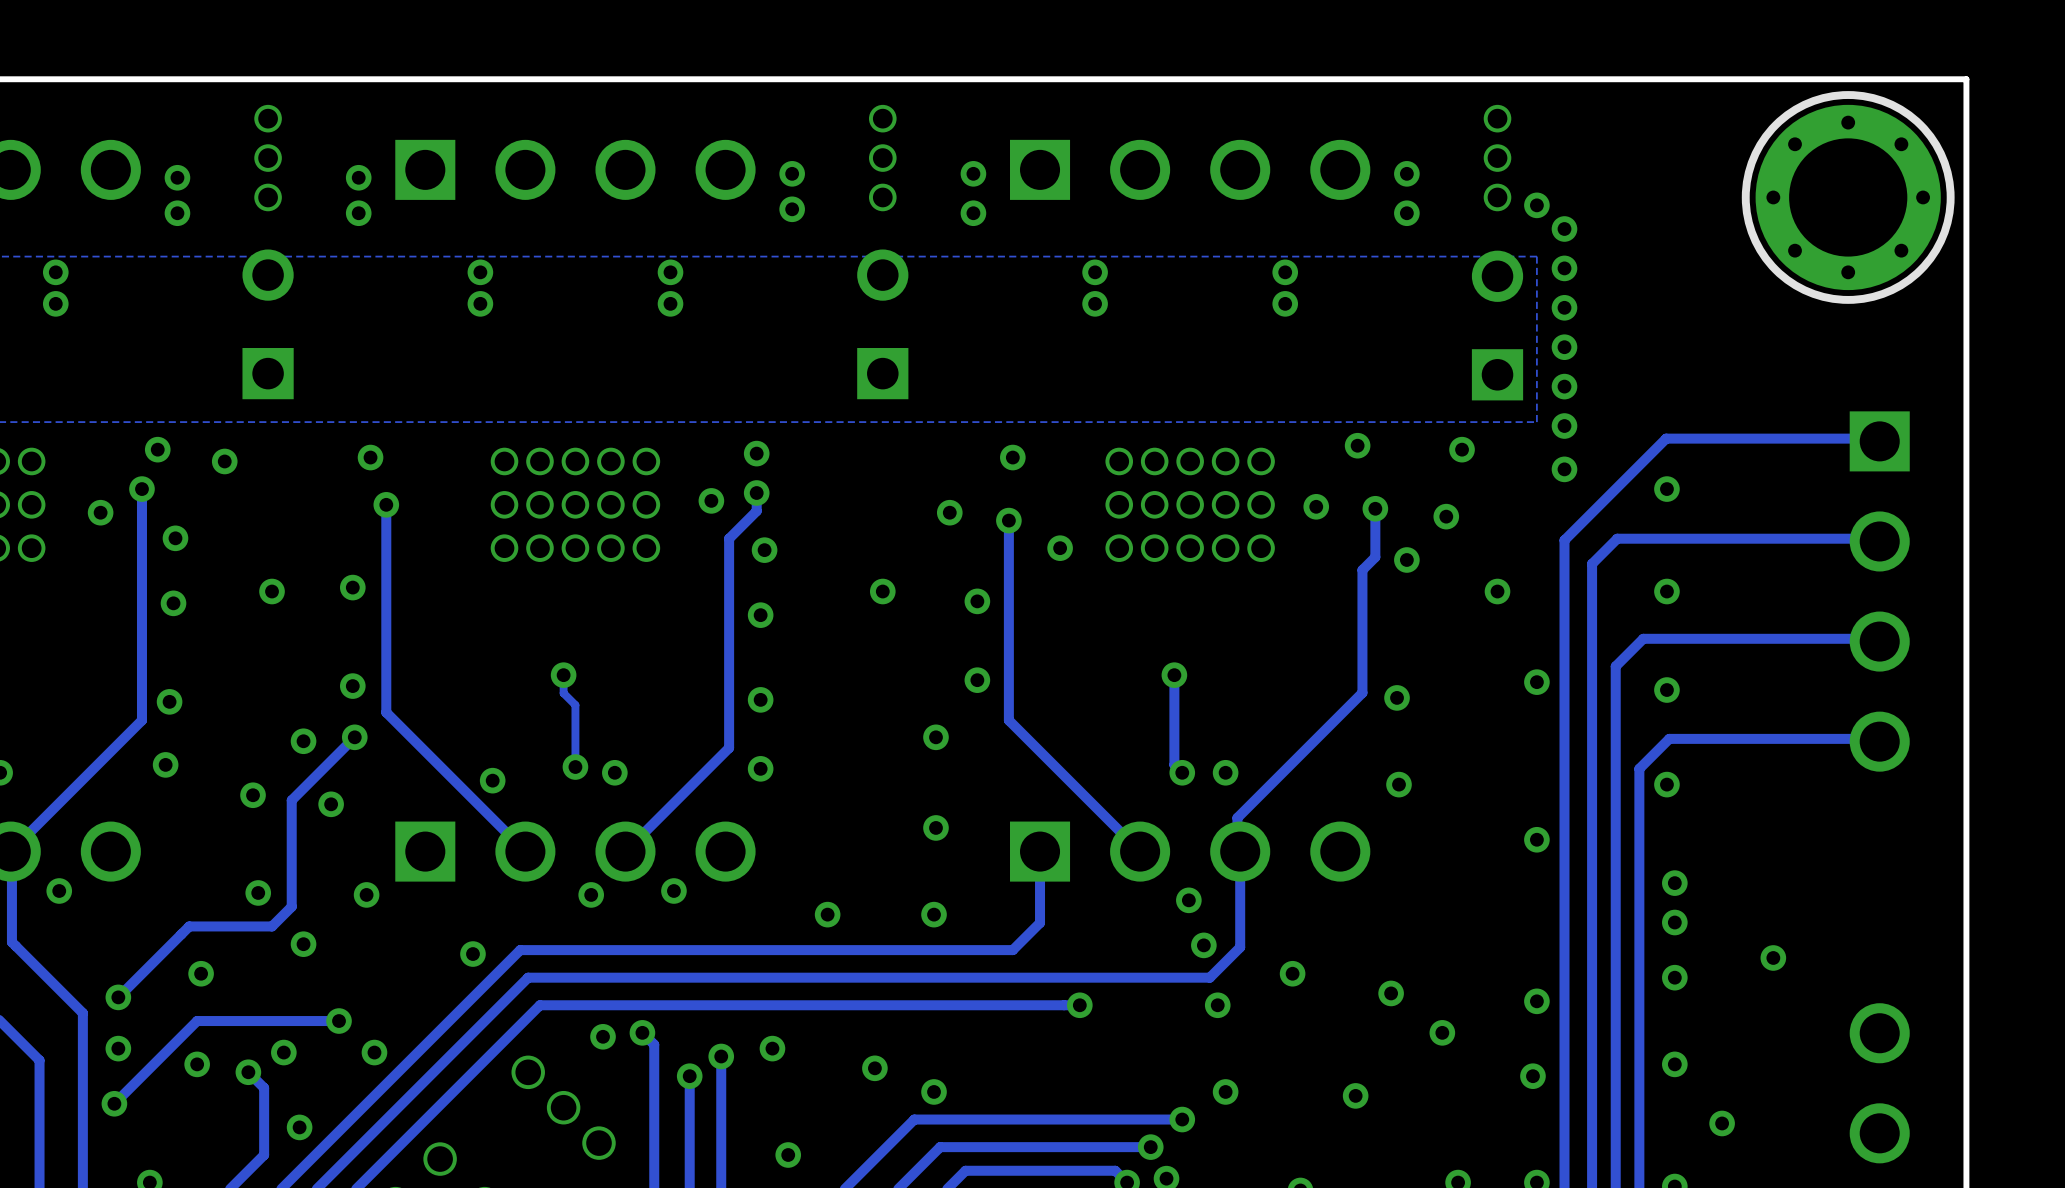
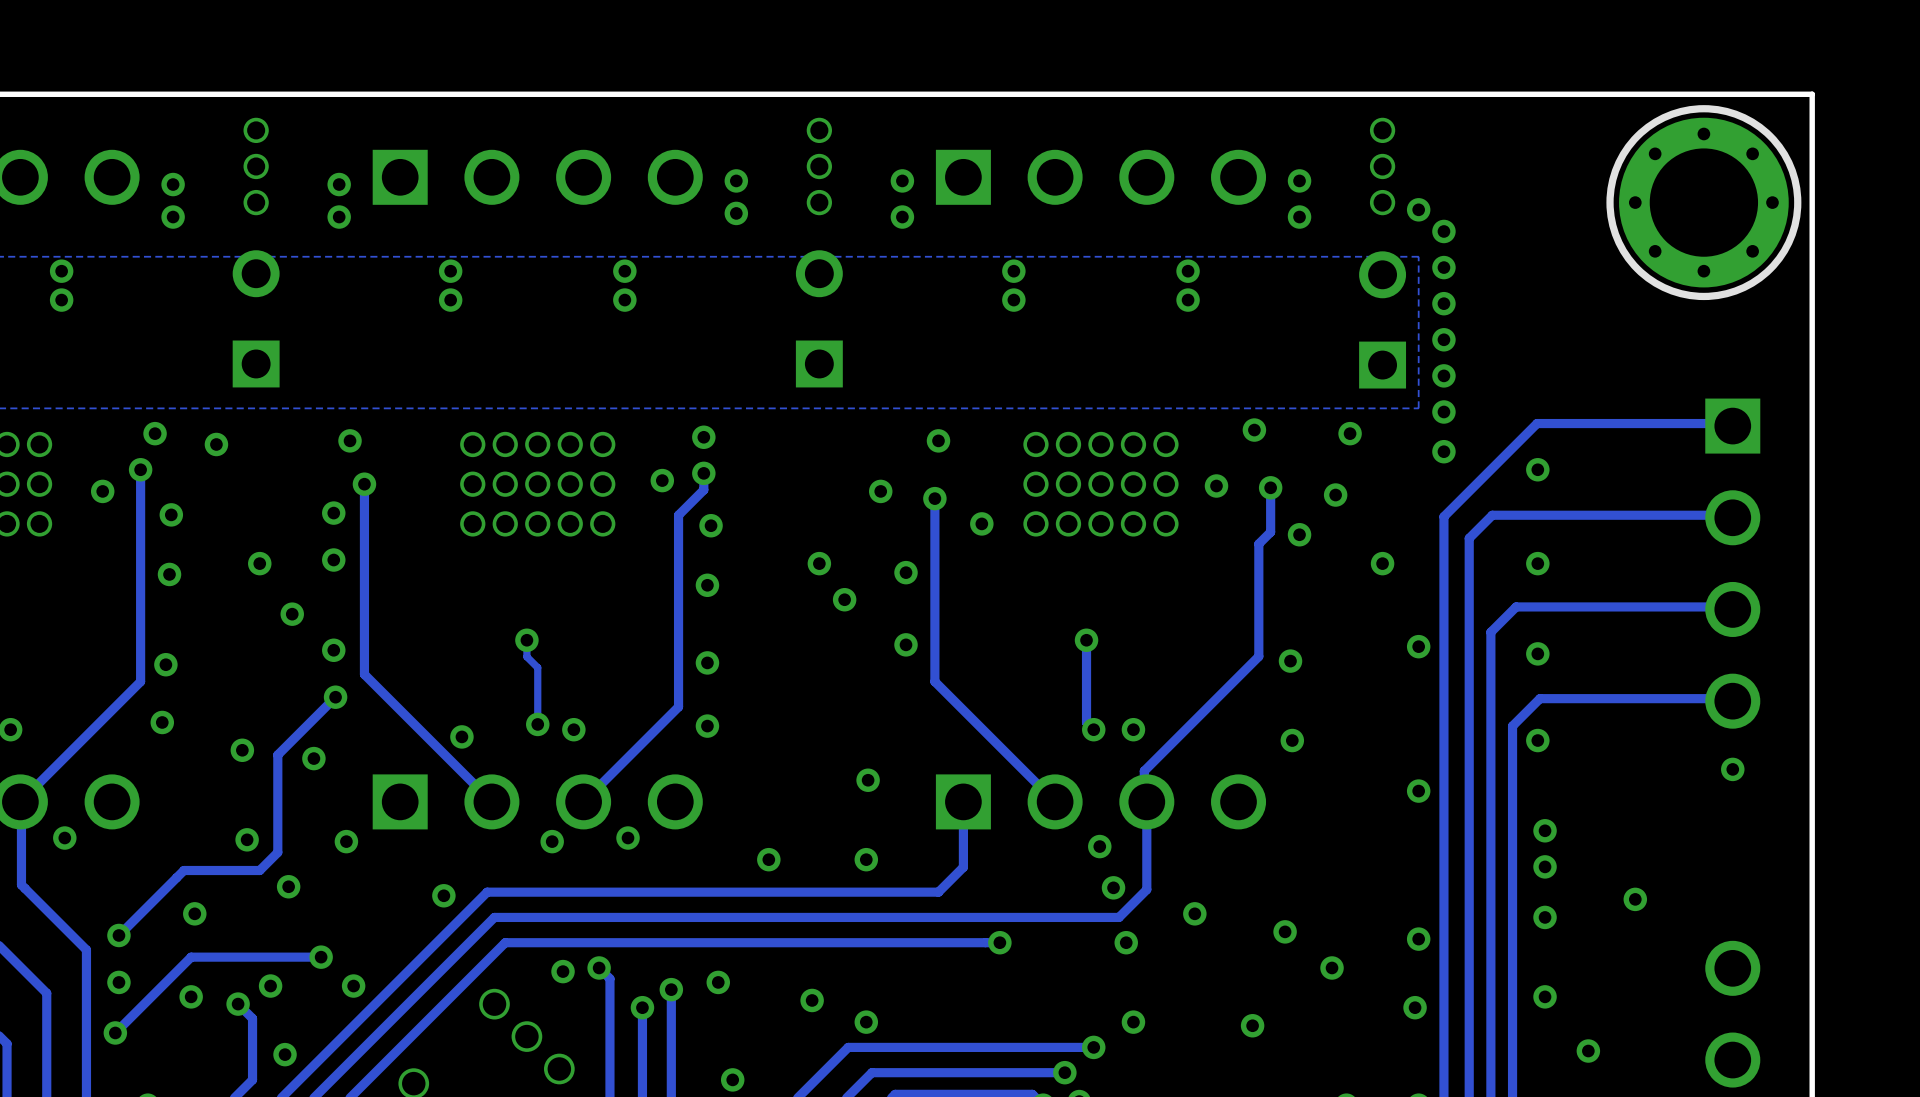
part: none -> (333, 513)
part position: (935, 737) -> (844, 599)
part position: (303, 741) -> (292, 614)
part: none -> (1732, 769)

